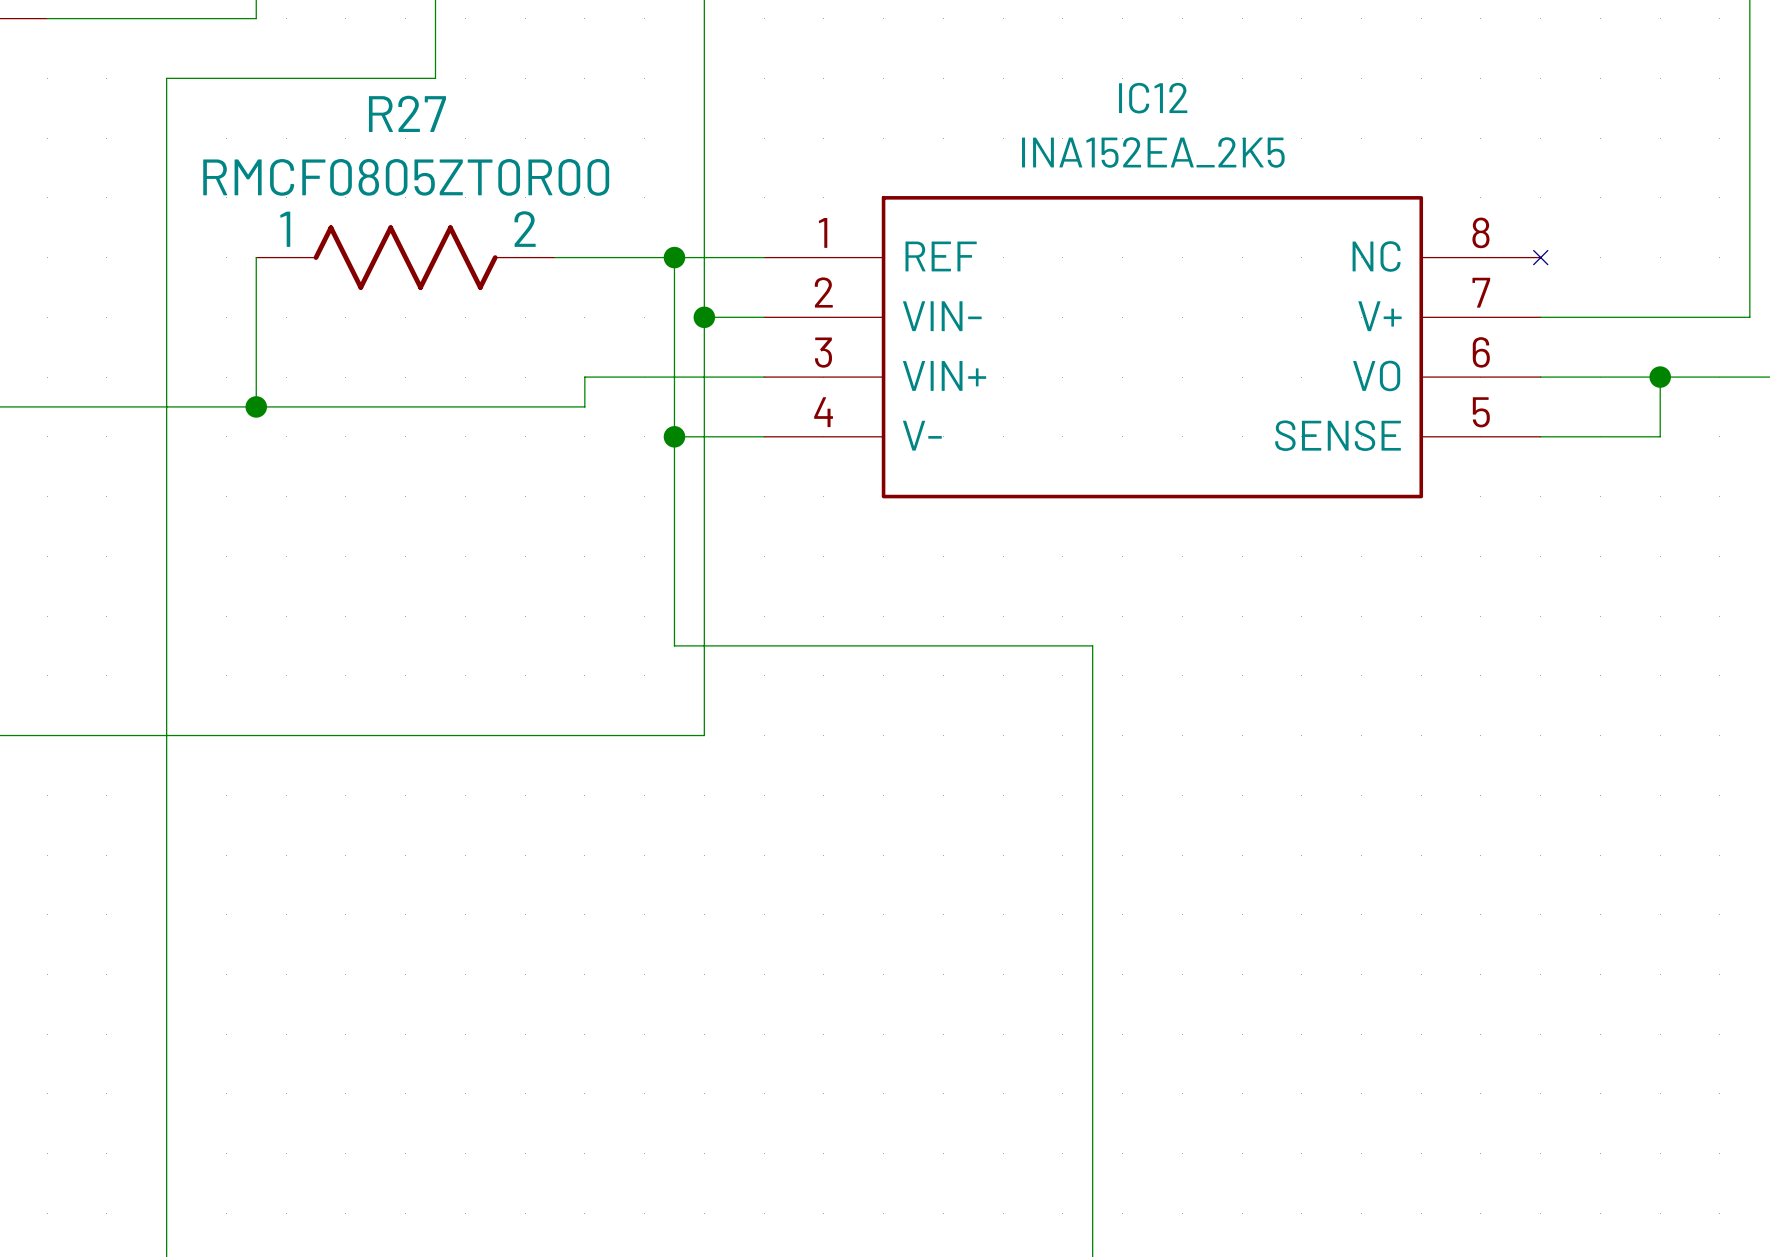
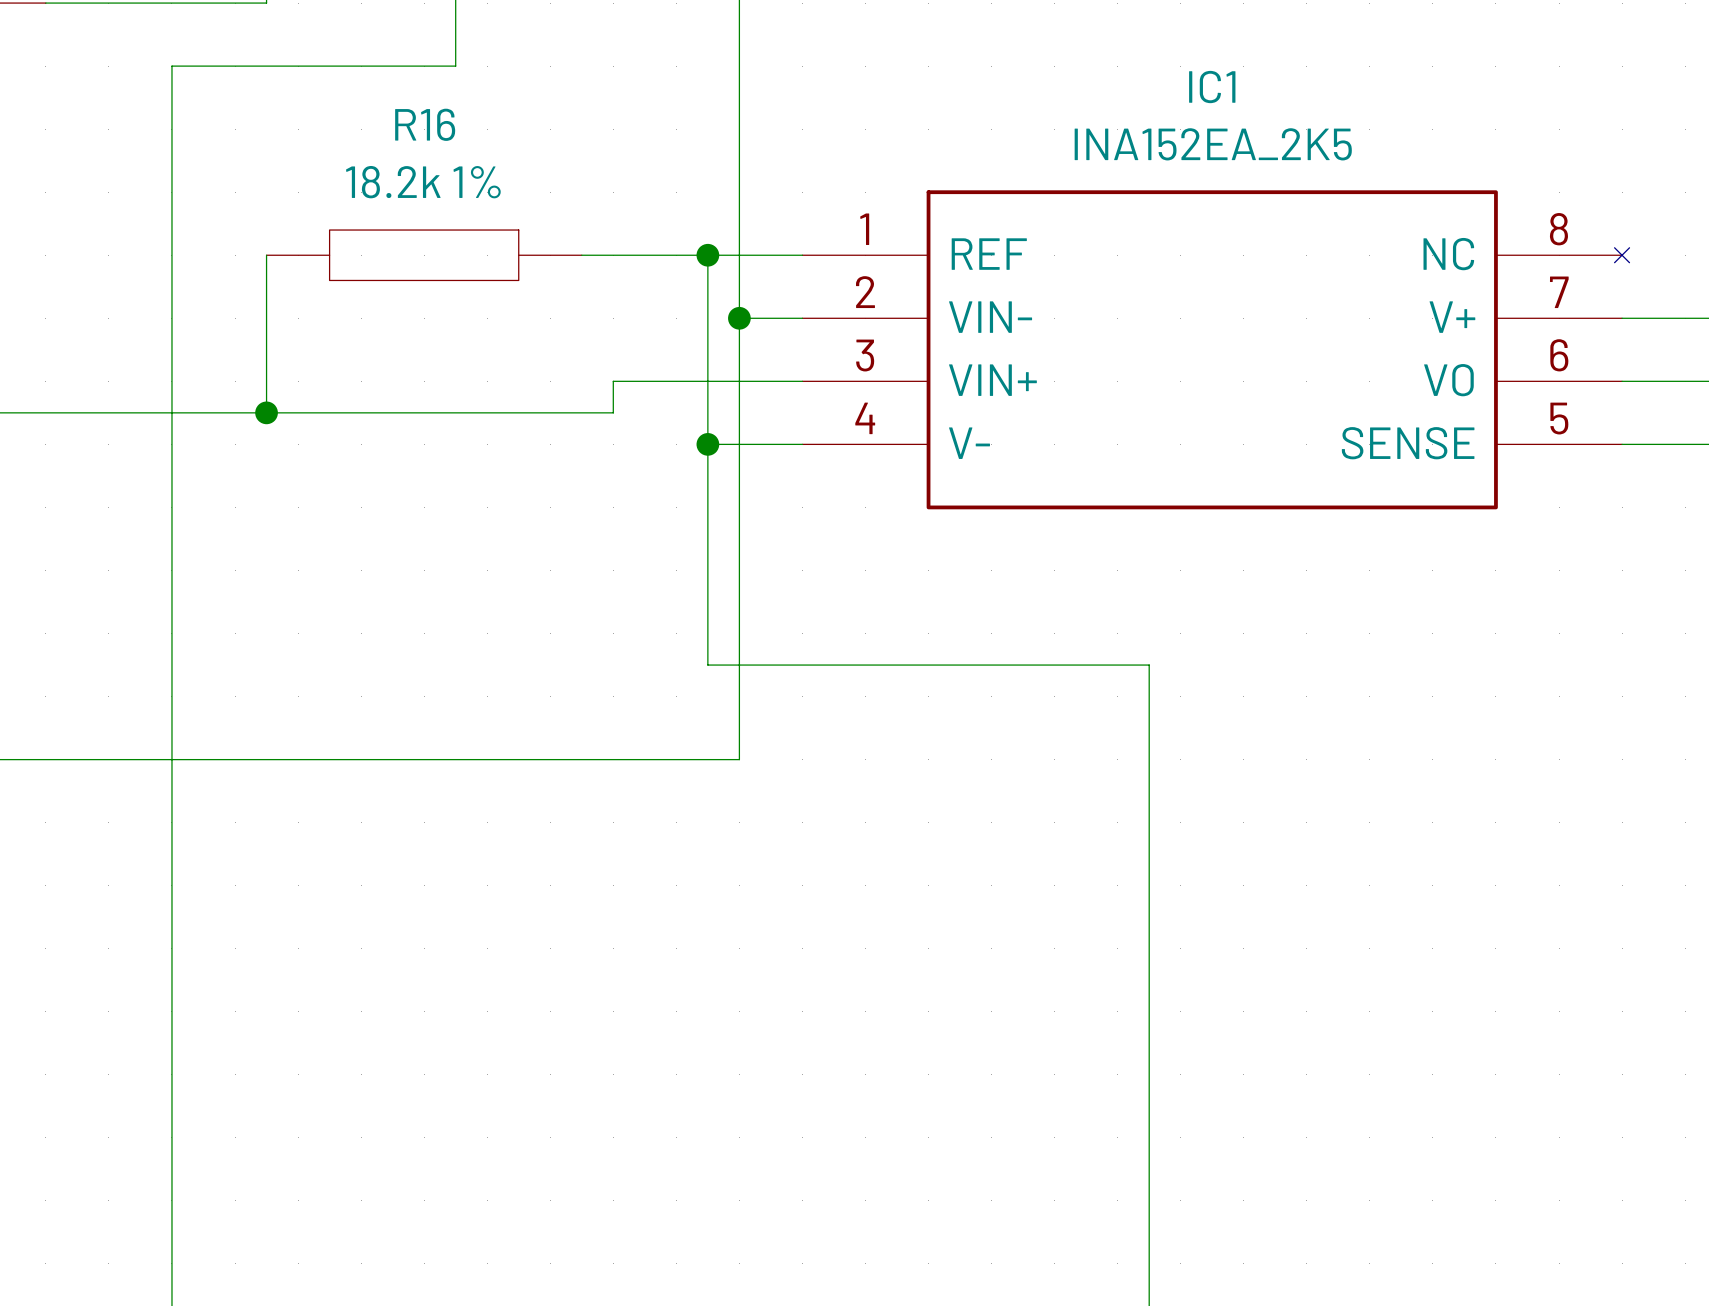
IC12 name: IC12 (1153, 98) -> IC1 (1212, 87)
R27: RMCF0805ZT0R00 (405, 257) -> none
R16: none -> 18.2k 1% (424, 255)

